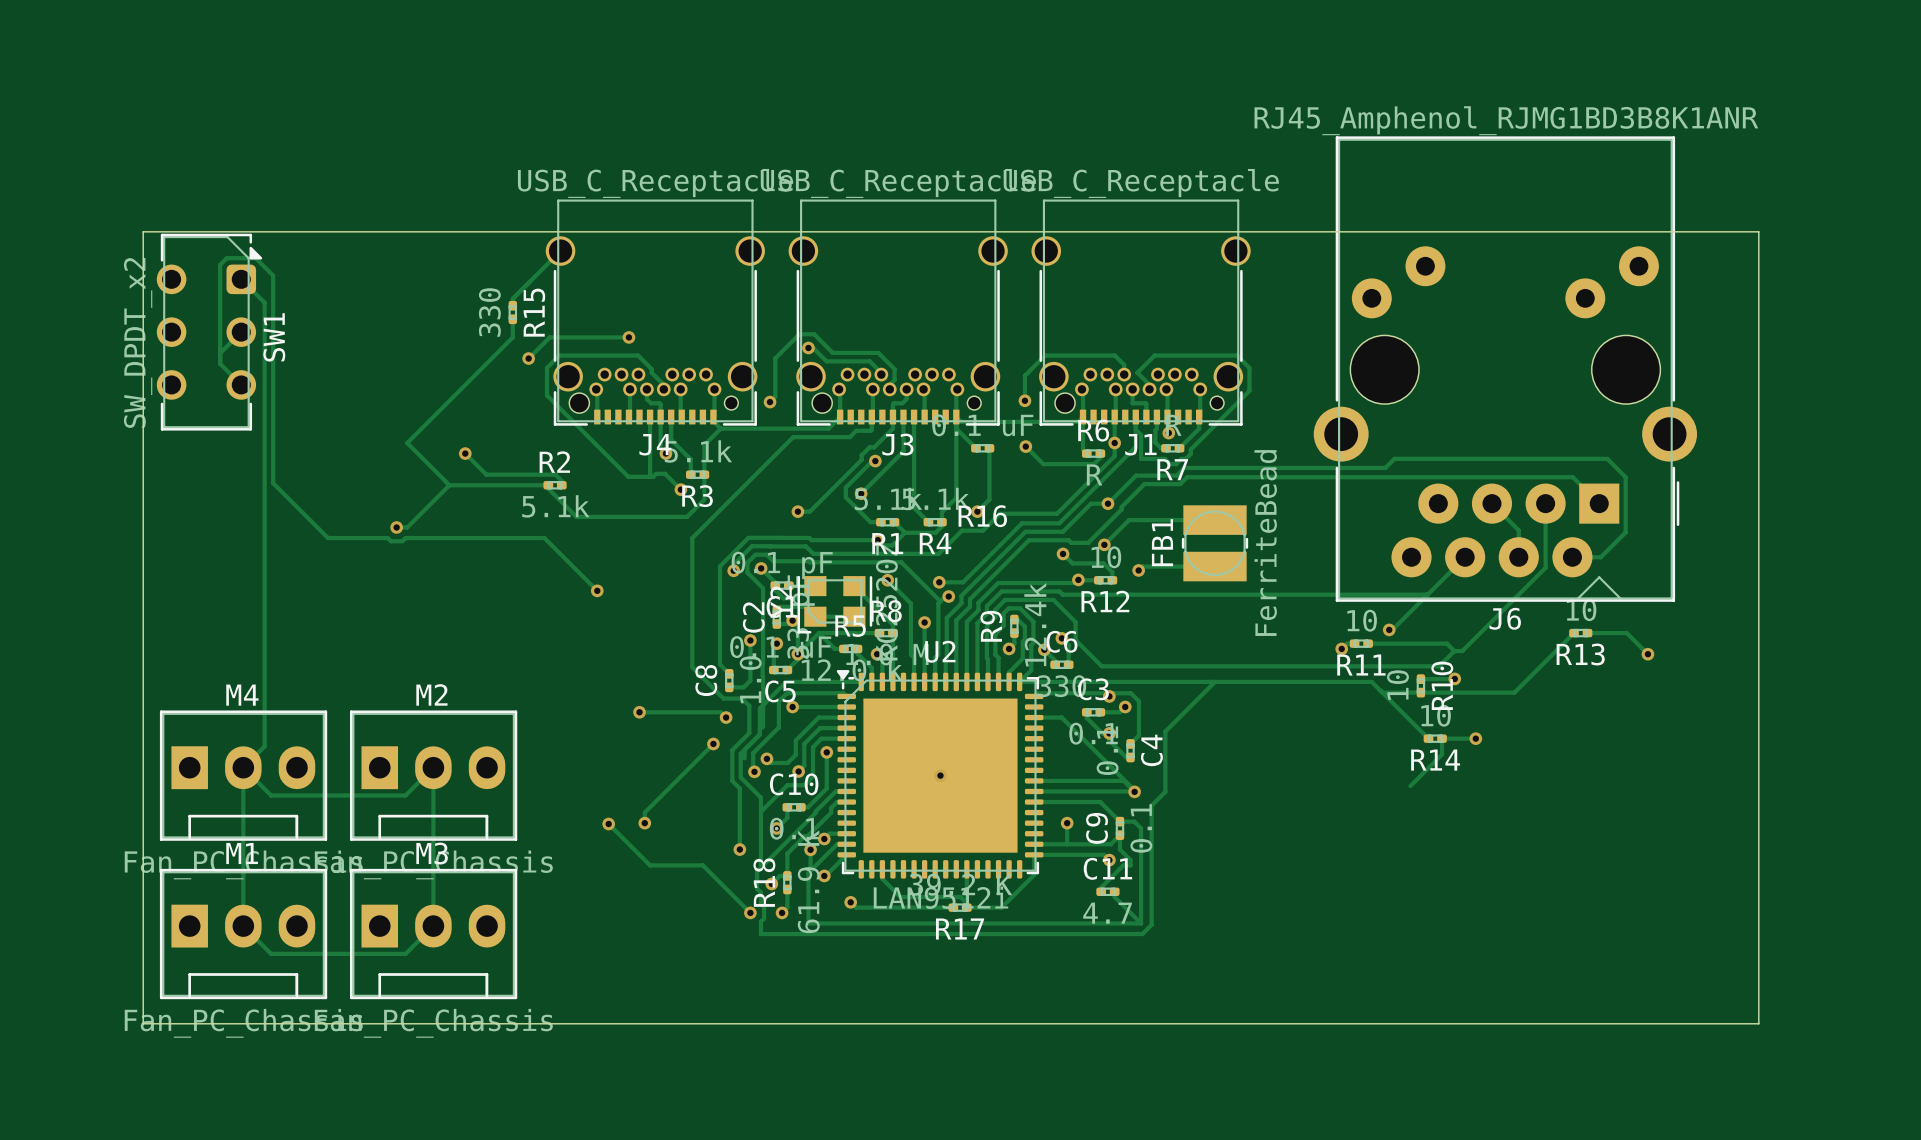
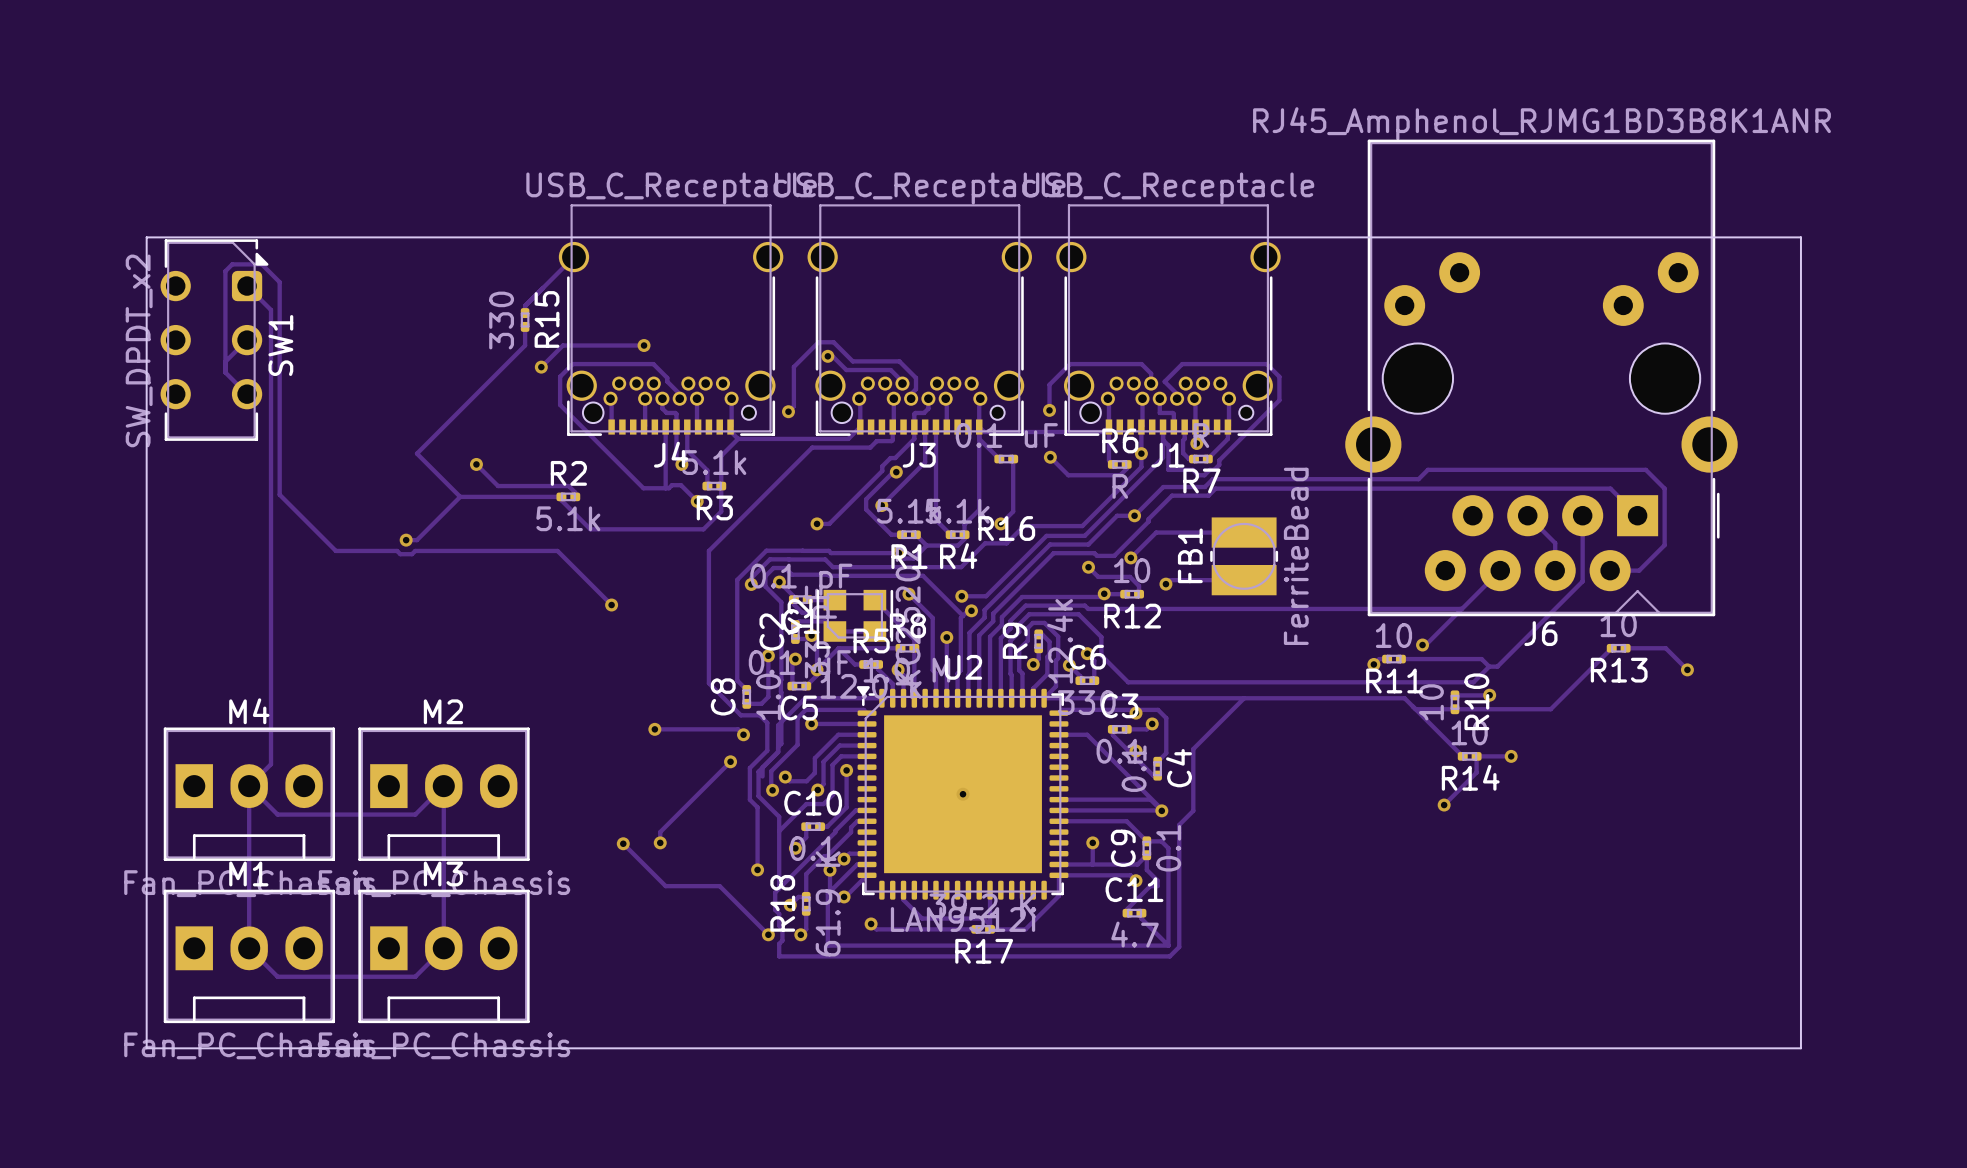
via: none -> (1444, 805)

